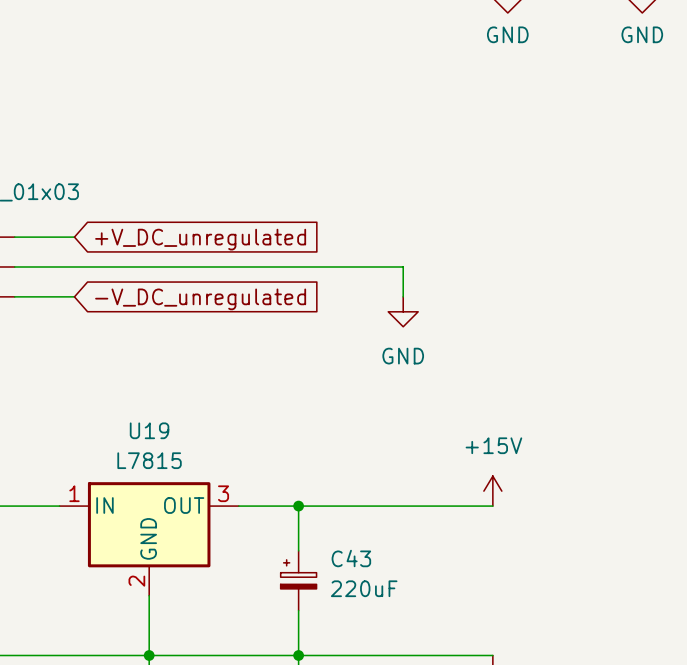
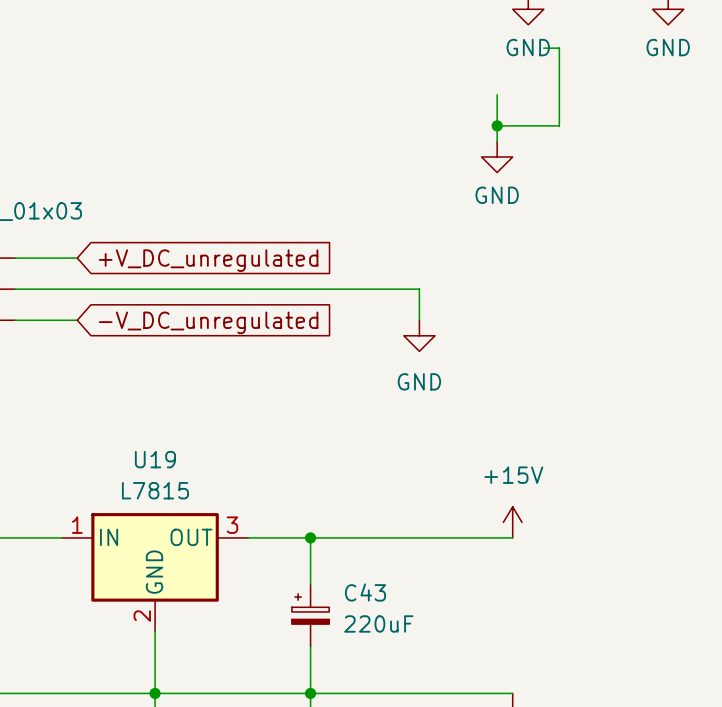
wire: none -> (543, 48) (559, 48) (559, 125) (497, 125)
wire: none -> (497, 94) (497, 141)
junction: none -> (497, 125)
power symbol: none -> GND (497, 156)

